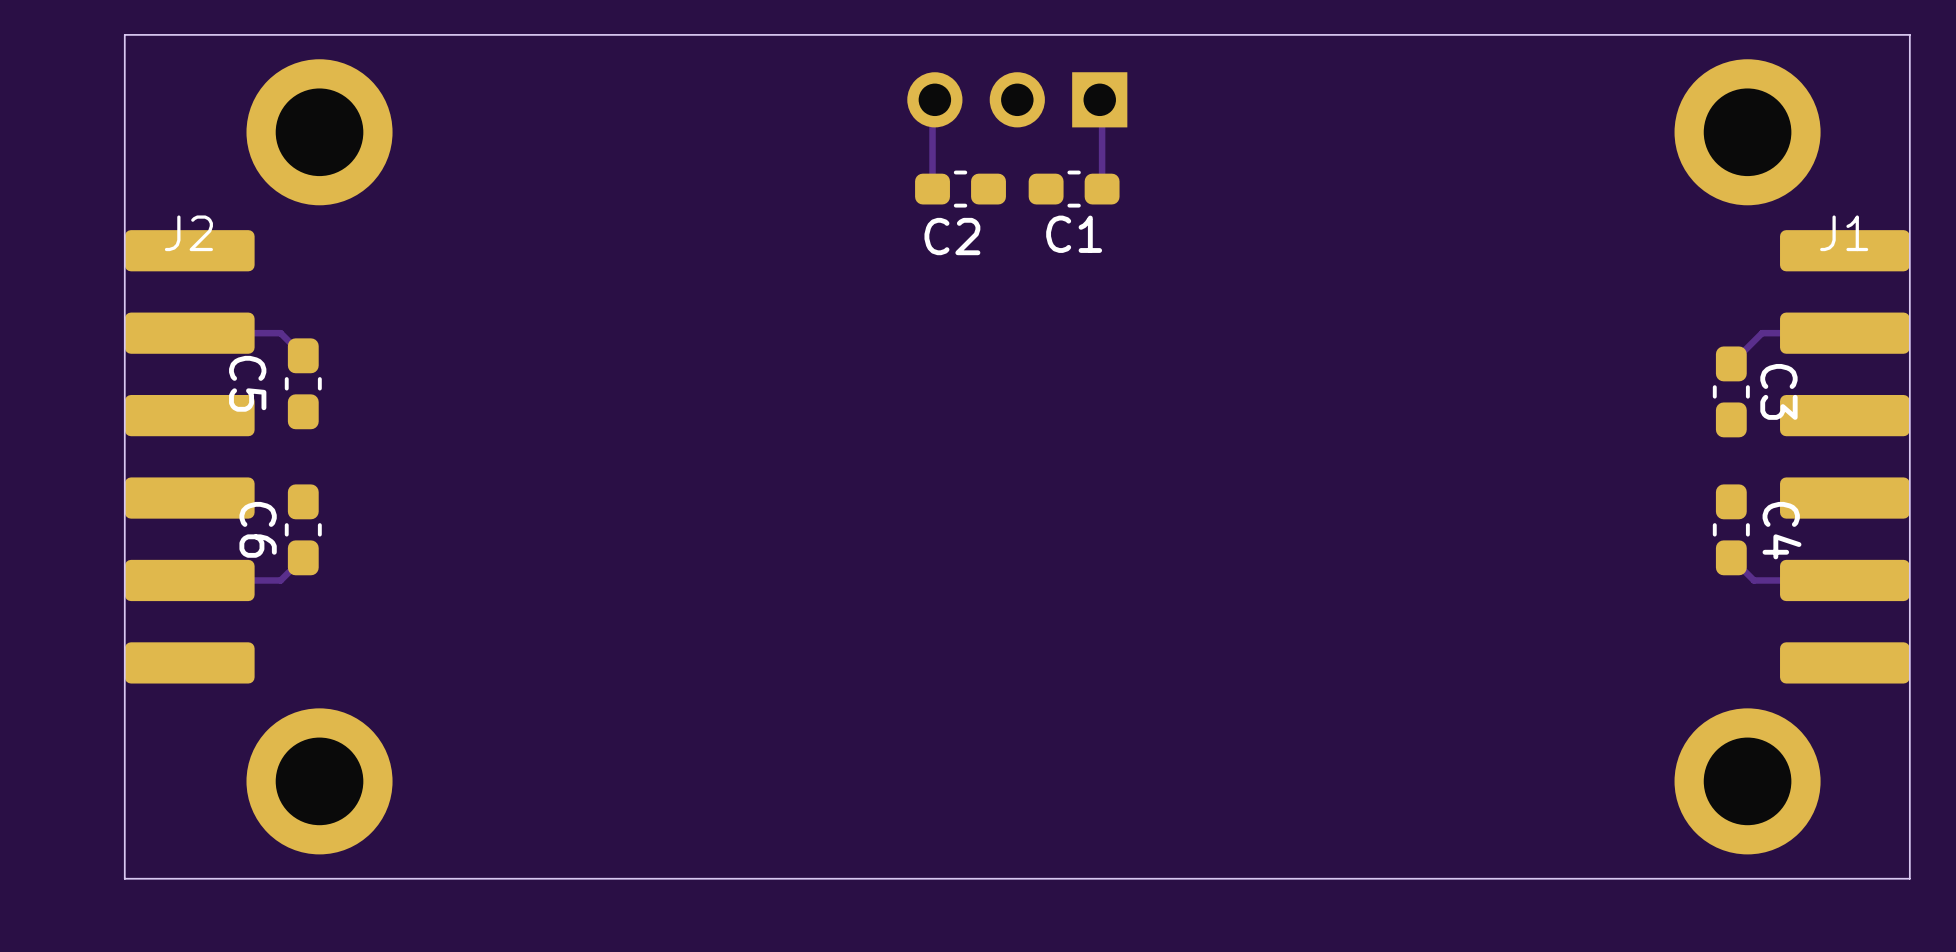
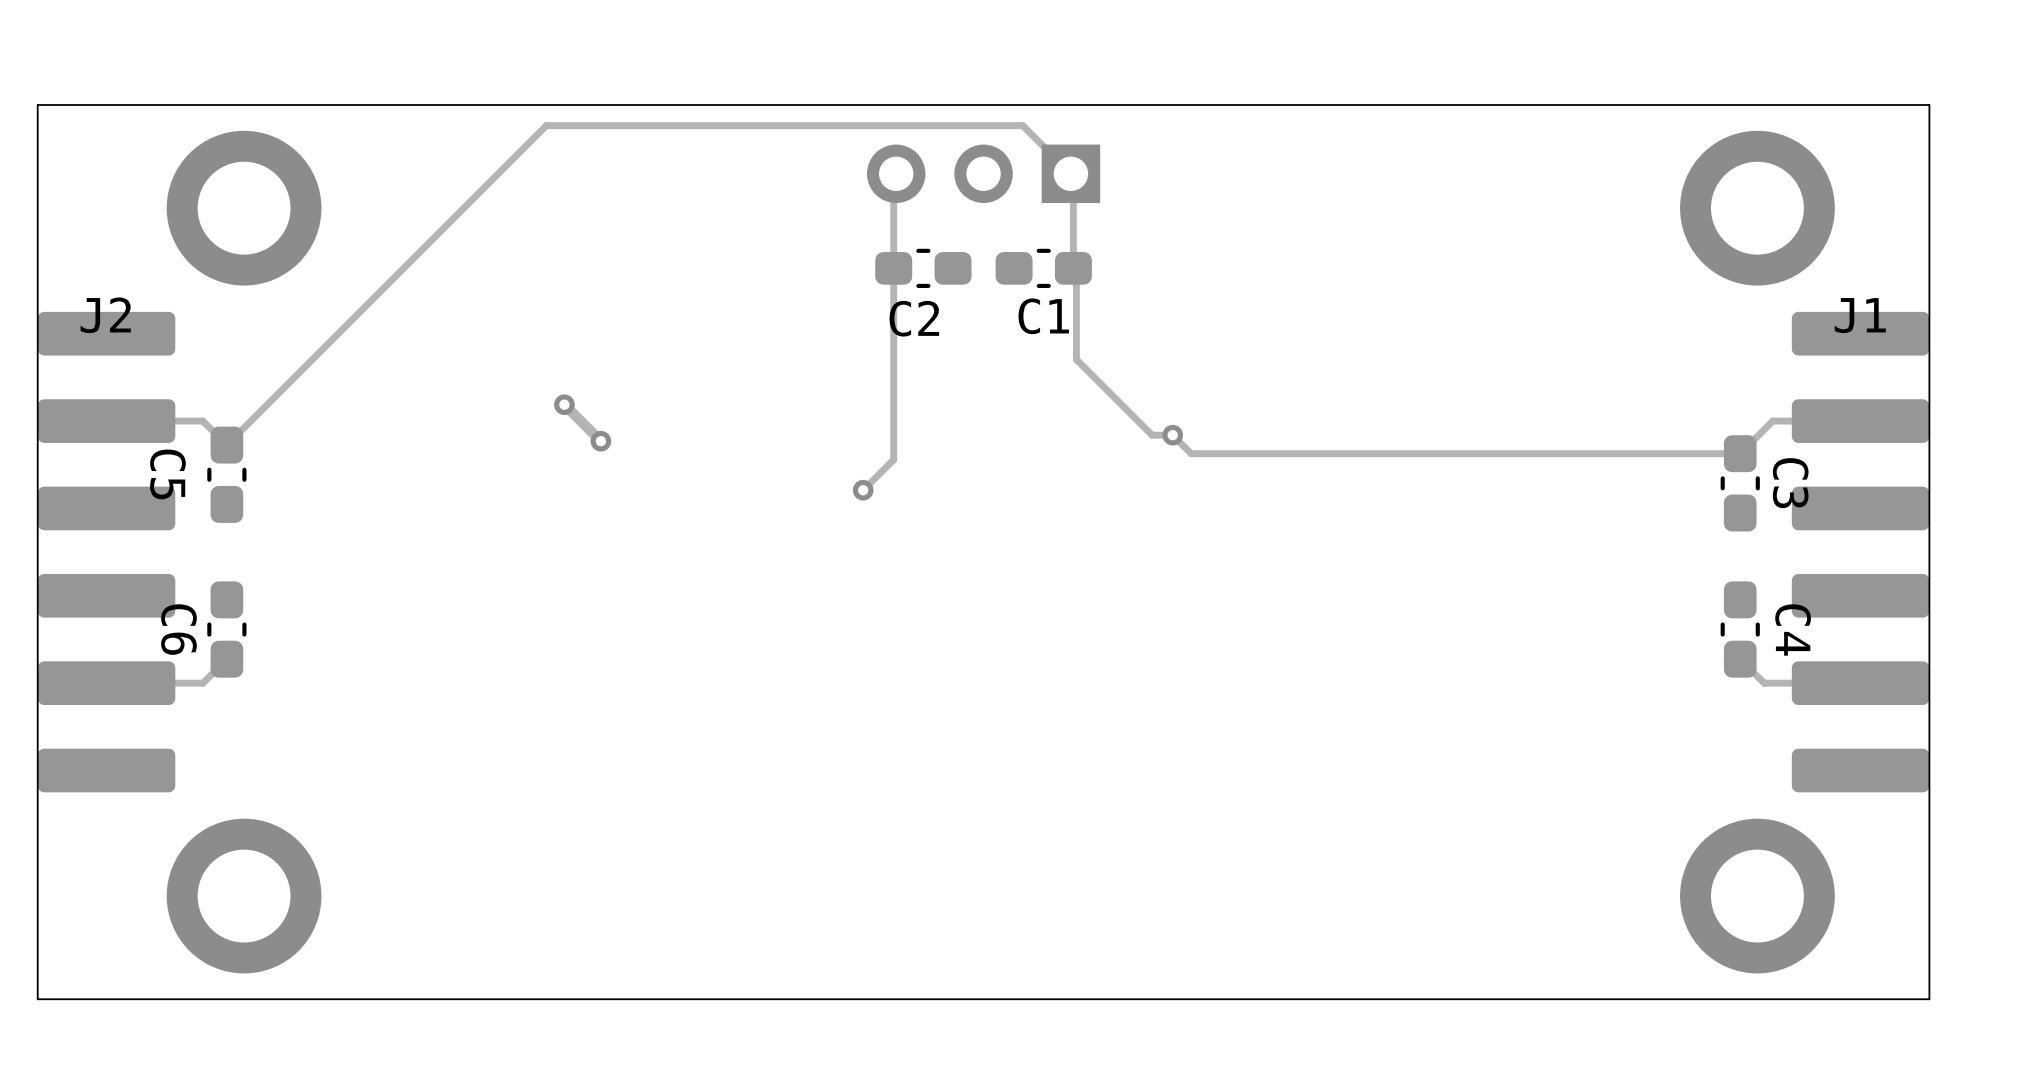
track: none -> (1070, 173) (1022, 125) (546, 125) (226, 445)
track: none -> (893, 268) (893, 459) (863, 490)
track: none -> (1073, 268) (1076, 271) (1076, 359) (1152, 435) (1172, 435) (1191, 453) (1740, 453)
track: none -> (564, 404) (600, 441)
via: none -> (564, 404)
via: none -> (1172, 435)
via: none -> (600, 441)
via: none -> (863, 490)

